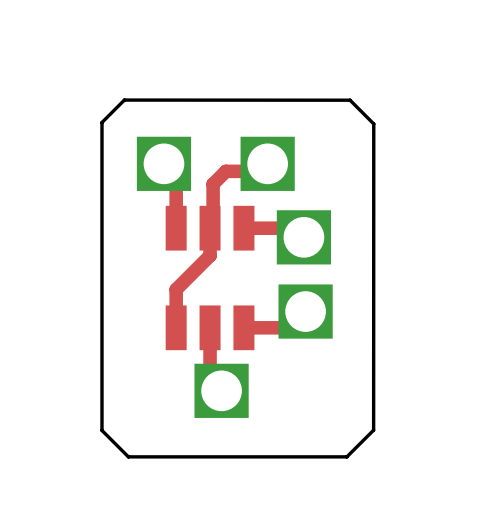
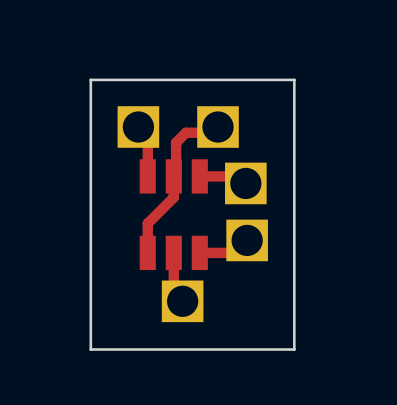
board edge: (101, 122) (124, 100) (350, 100) (373, 123) (373, 430) (346, 456) (128, 456) (101, 430) -> (90, 95) (90, 79) (294, 79) (294, 349) (90, 349) (90, 331)

